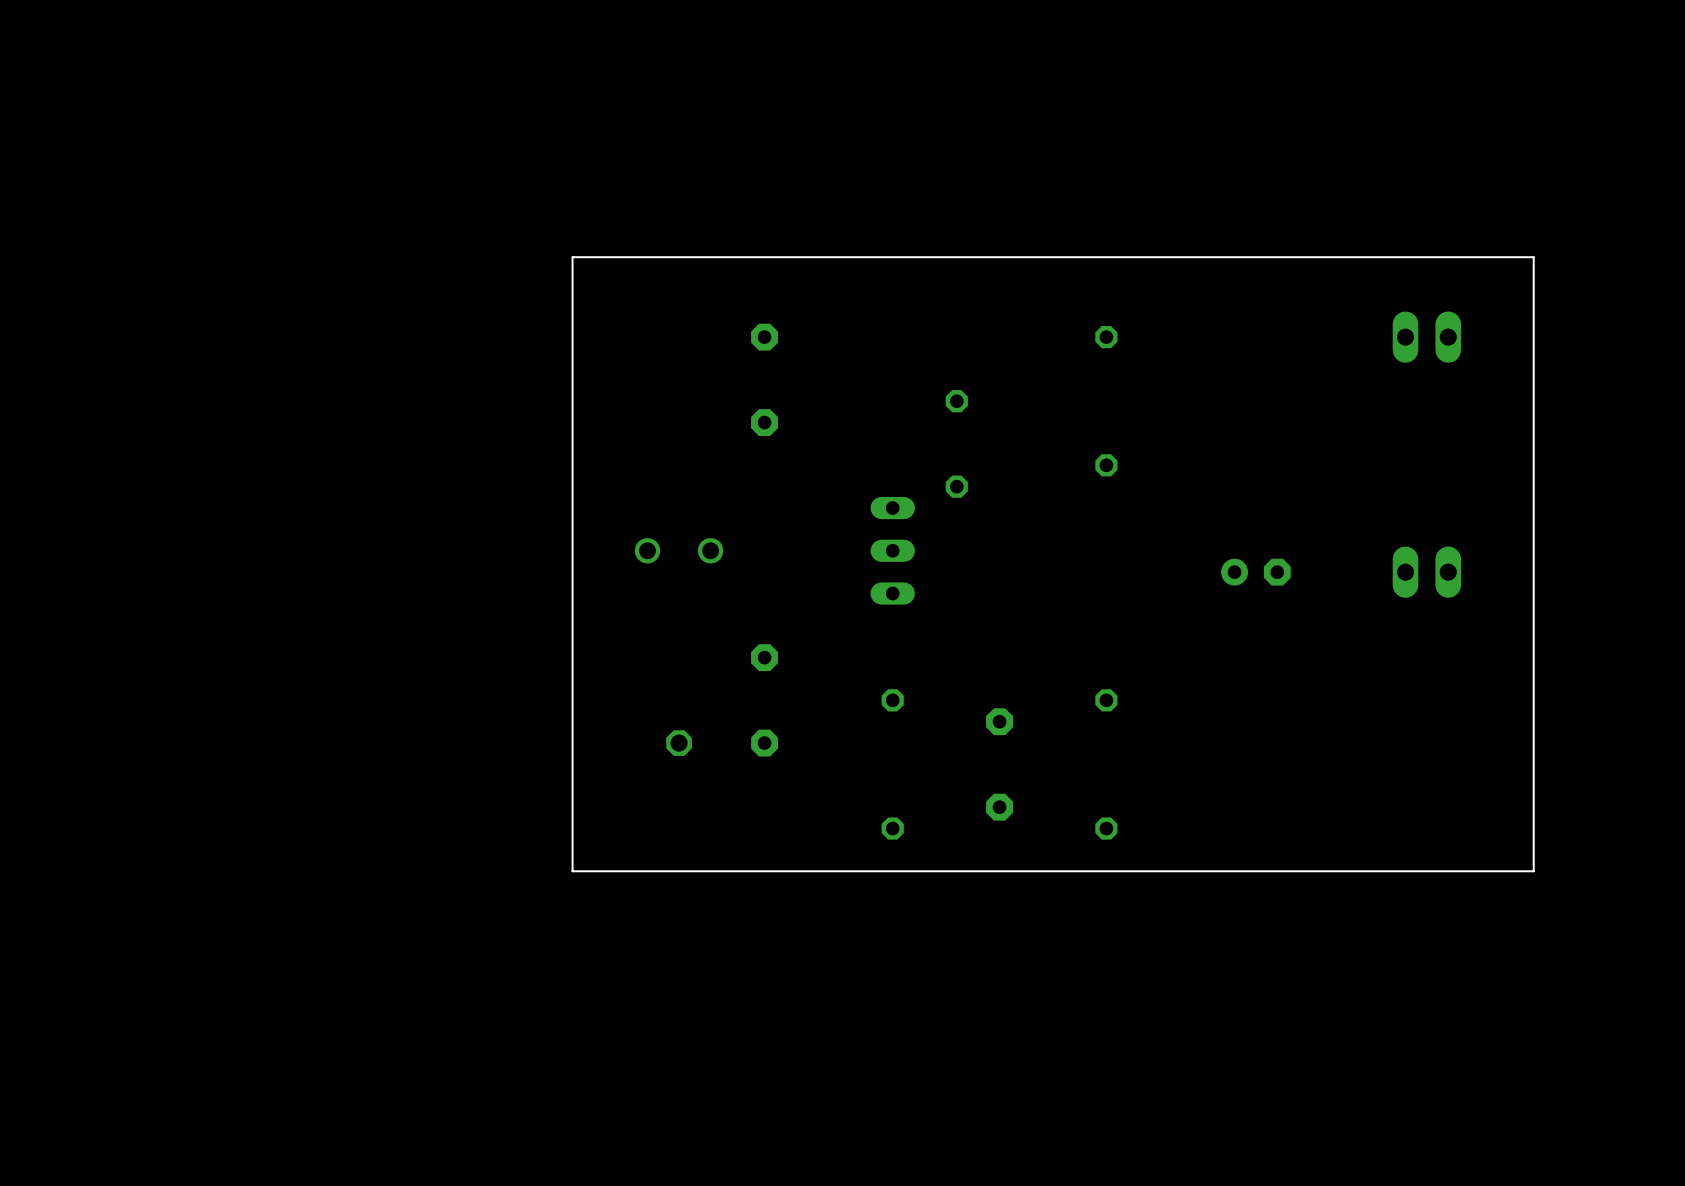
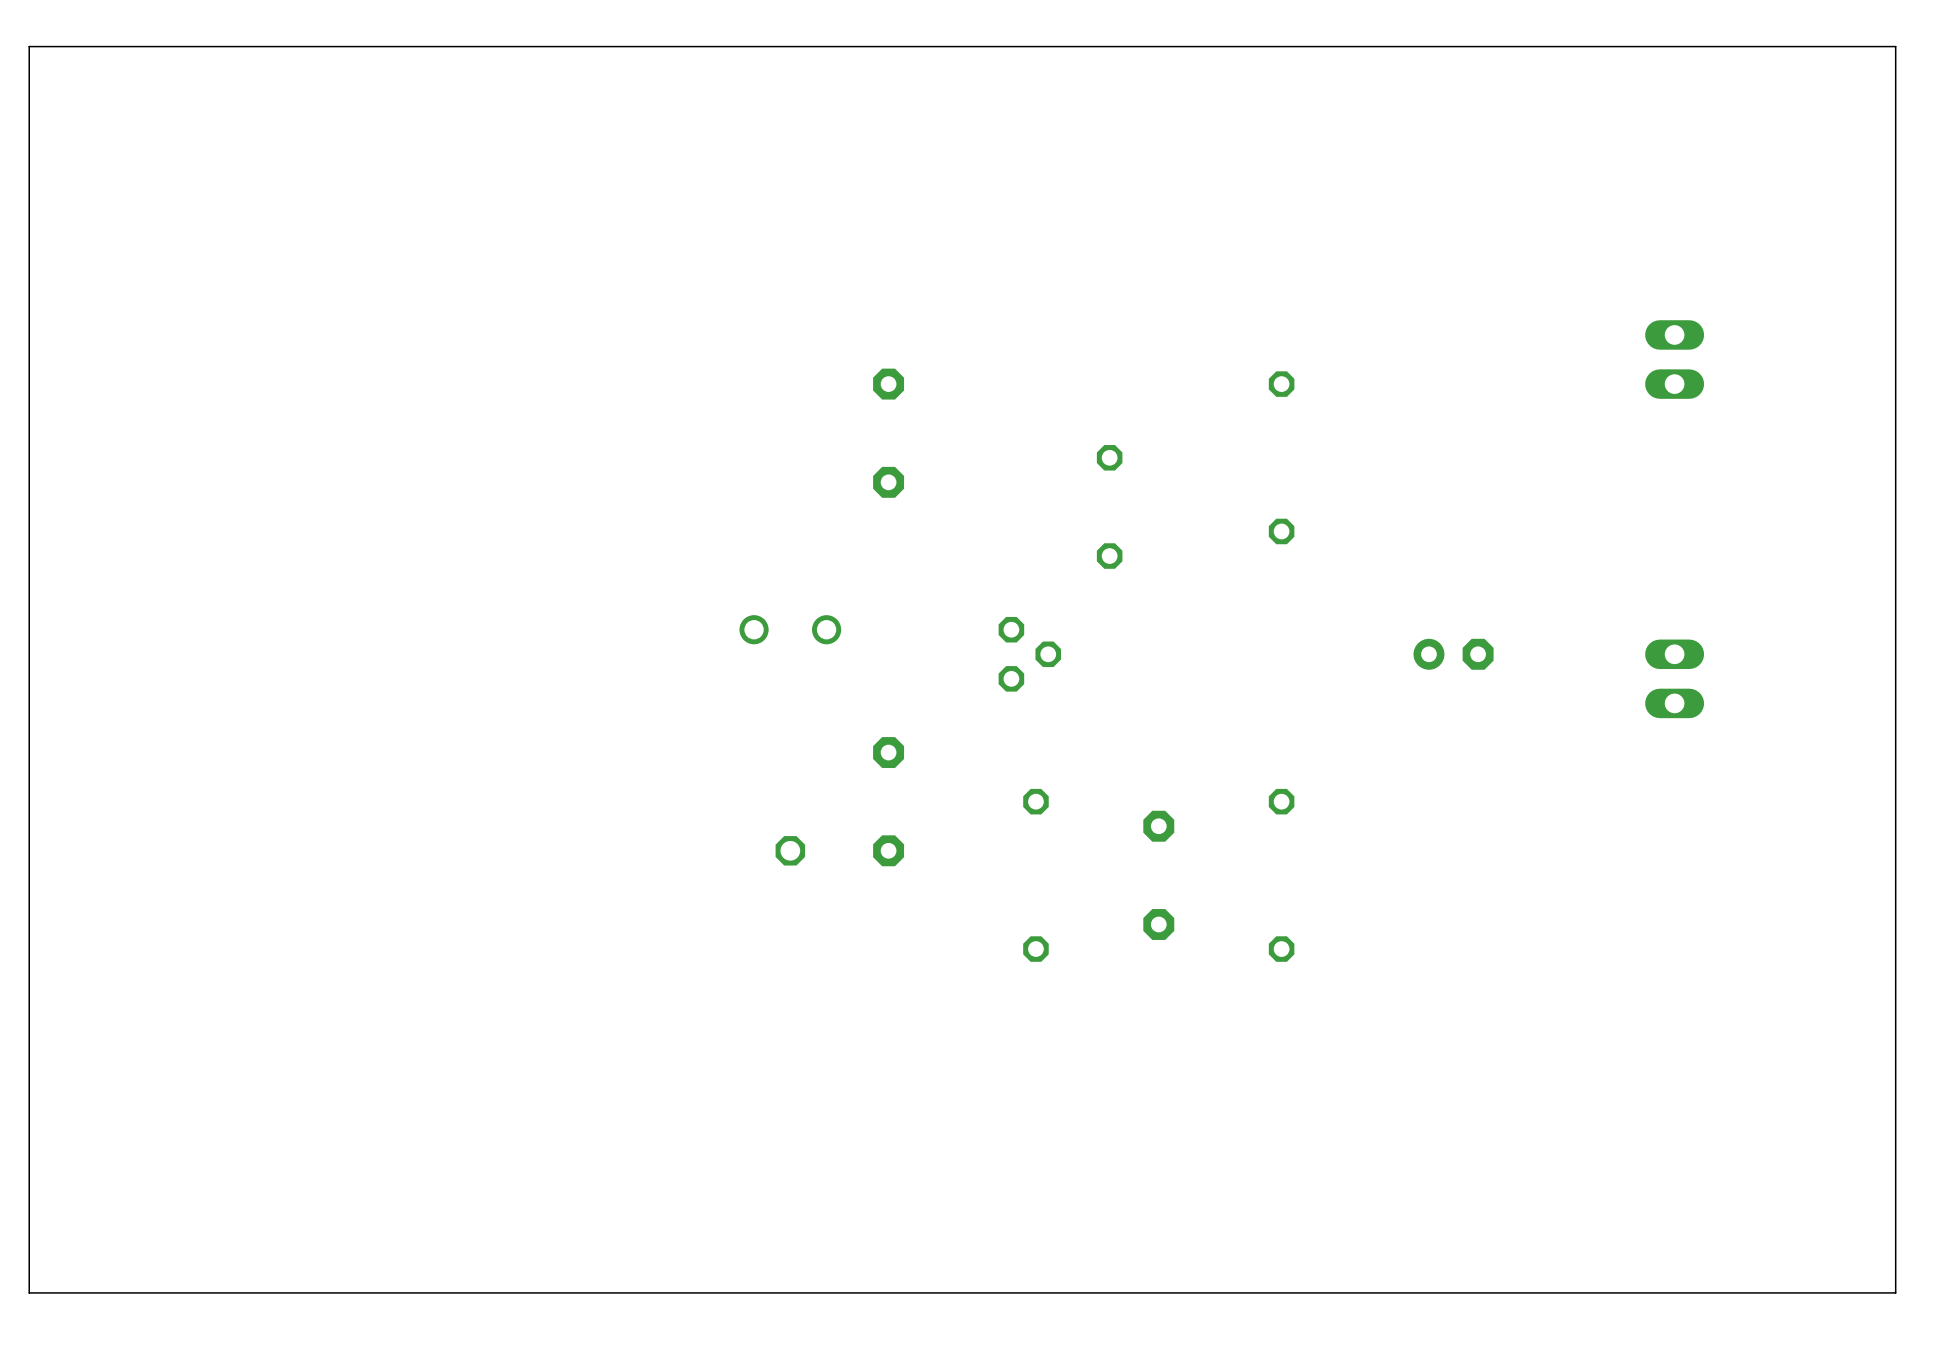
board edge: none -> (1895, 46) (29, 46) (29, 1292) (1895, 1292) (1895, 46)
board edge: (1533, 257) (572, 257) (572, 871) (1533, 871) (1533, 257) -> none
part rotation: 0° (1426, 337) -> 90° clockwise (1674, 359)
part: (892, 550) -> none
part: none -> (1029, 654)
part rotation: 0° (1426, 572) -> 90° clockwise (1674, 678)

